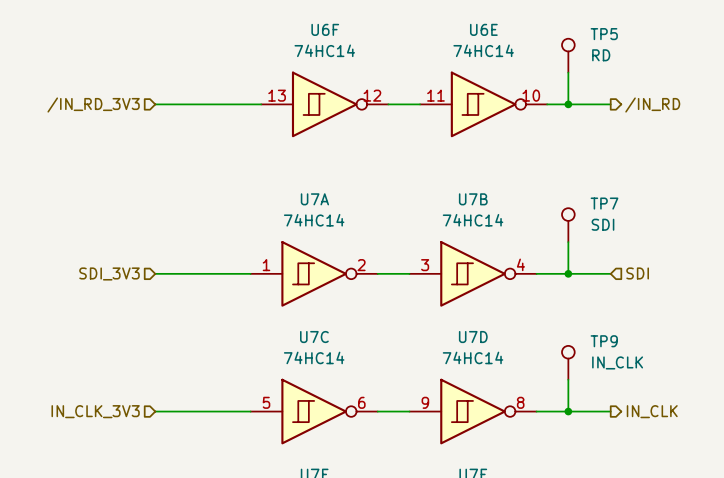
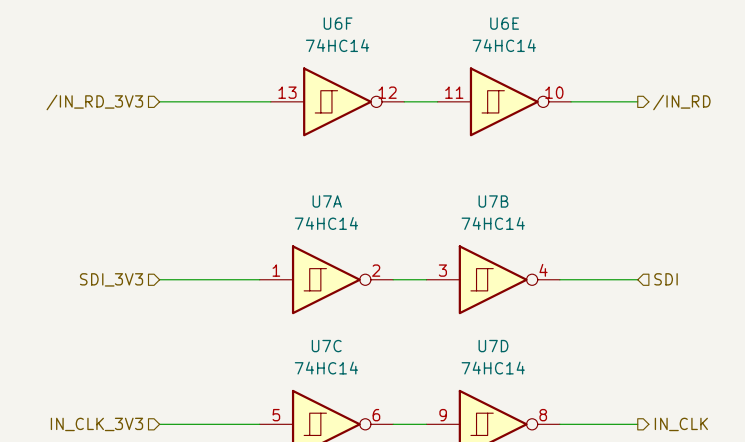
TP5: RD (568, 55) -> none
wire: (568, 72) (568, 104) -> none
junction: (568, 104) -> none
TP7: SDI (568, 225) -> none
wire: (568, 242) (568, 273) -> none
junction: (568, 273) -> none
TP9: IN_CLK (568, 362) -> none
wire: (568, 379) (568, 411) -> none
junction: (568, 411) -> none

